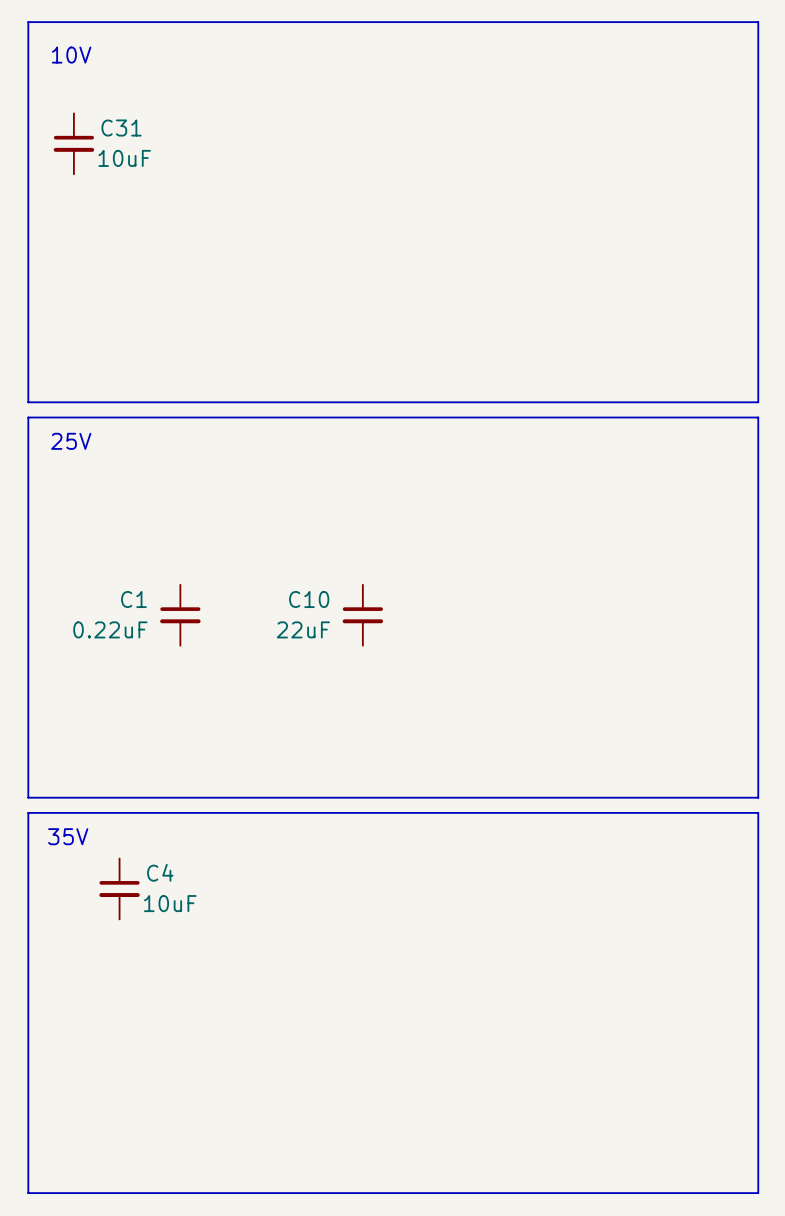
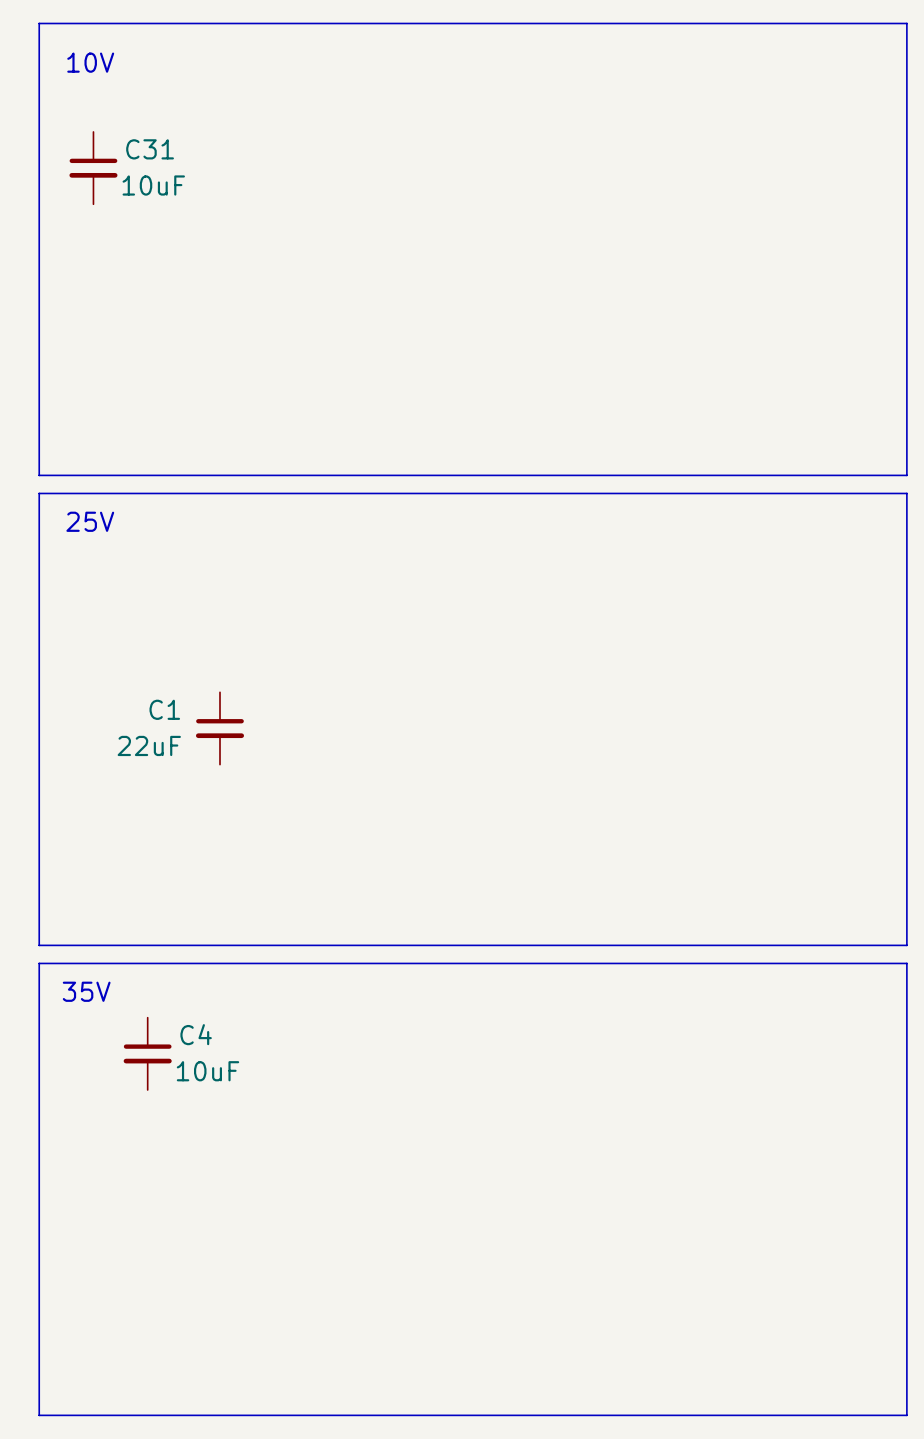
C10: 22uF (362, 615) -> none
C1 value: 0.22uF (110, 629) -> 22uF (149, 745)

